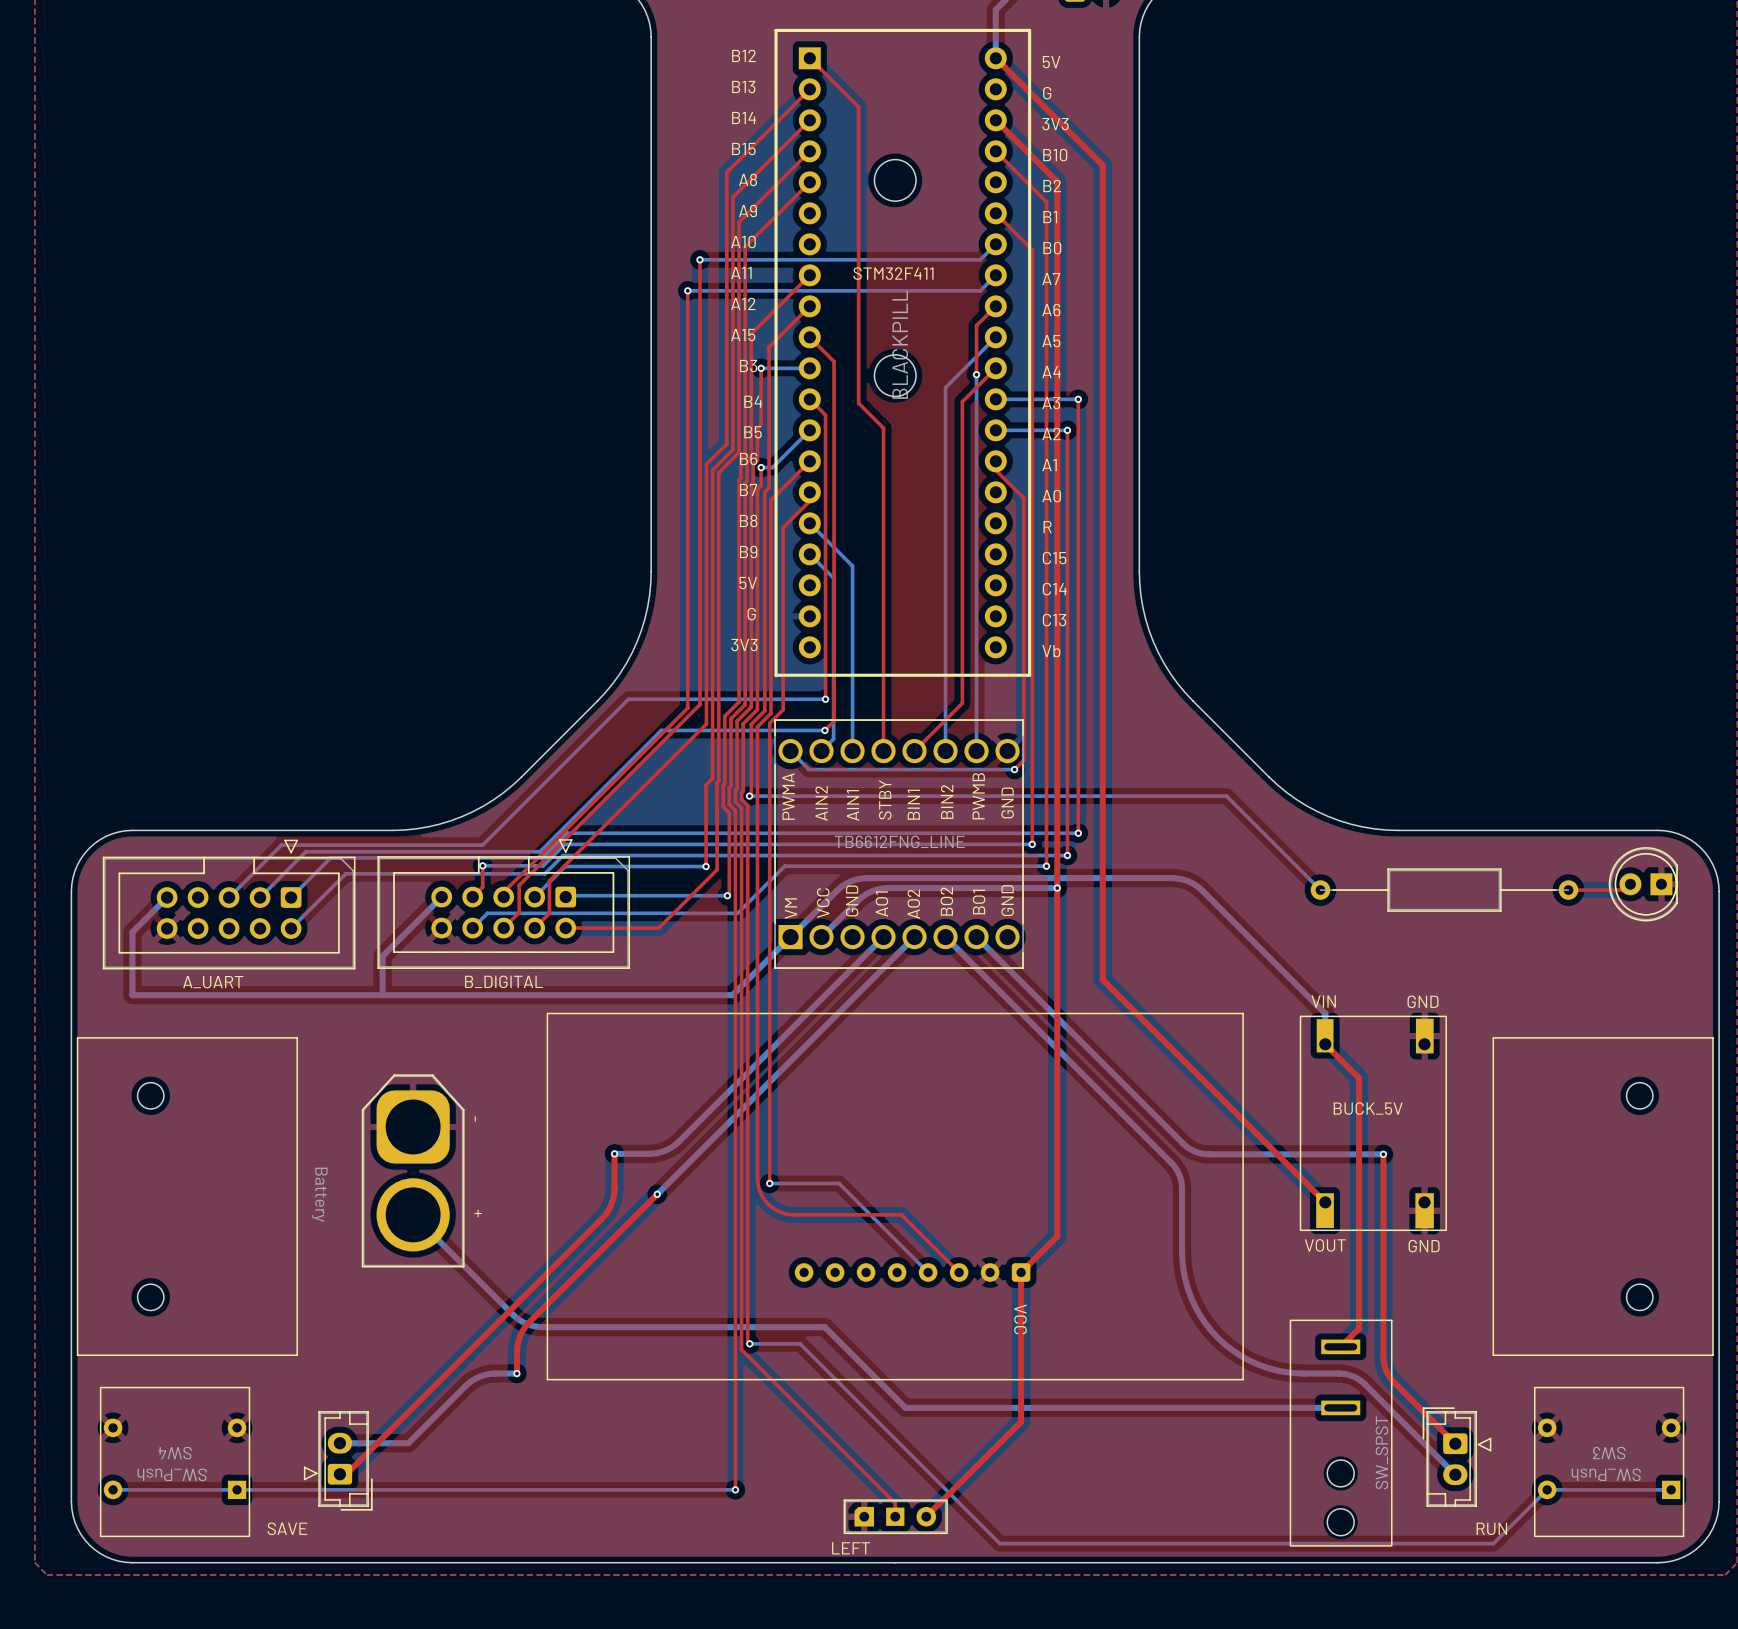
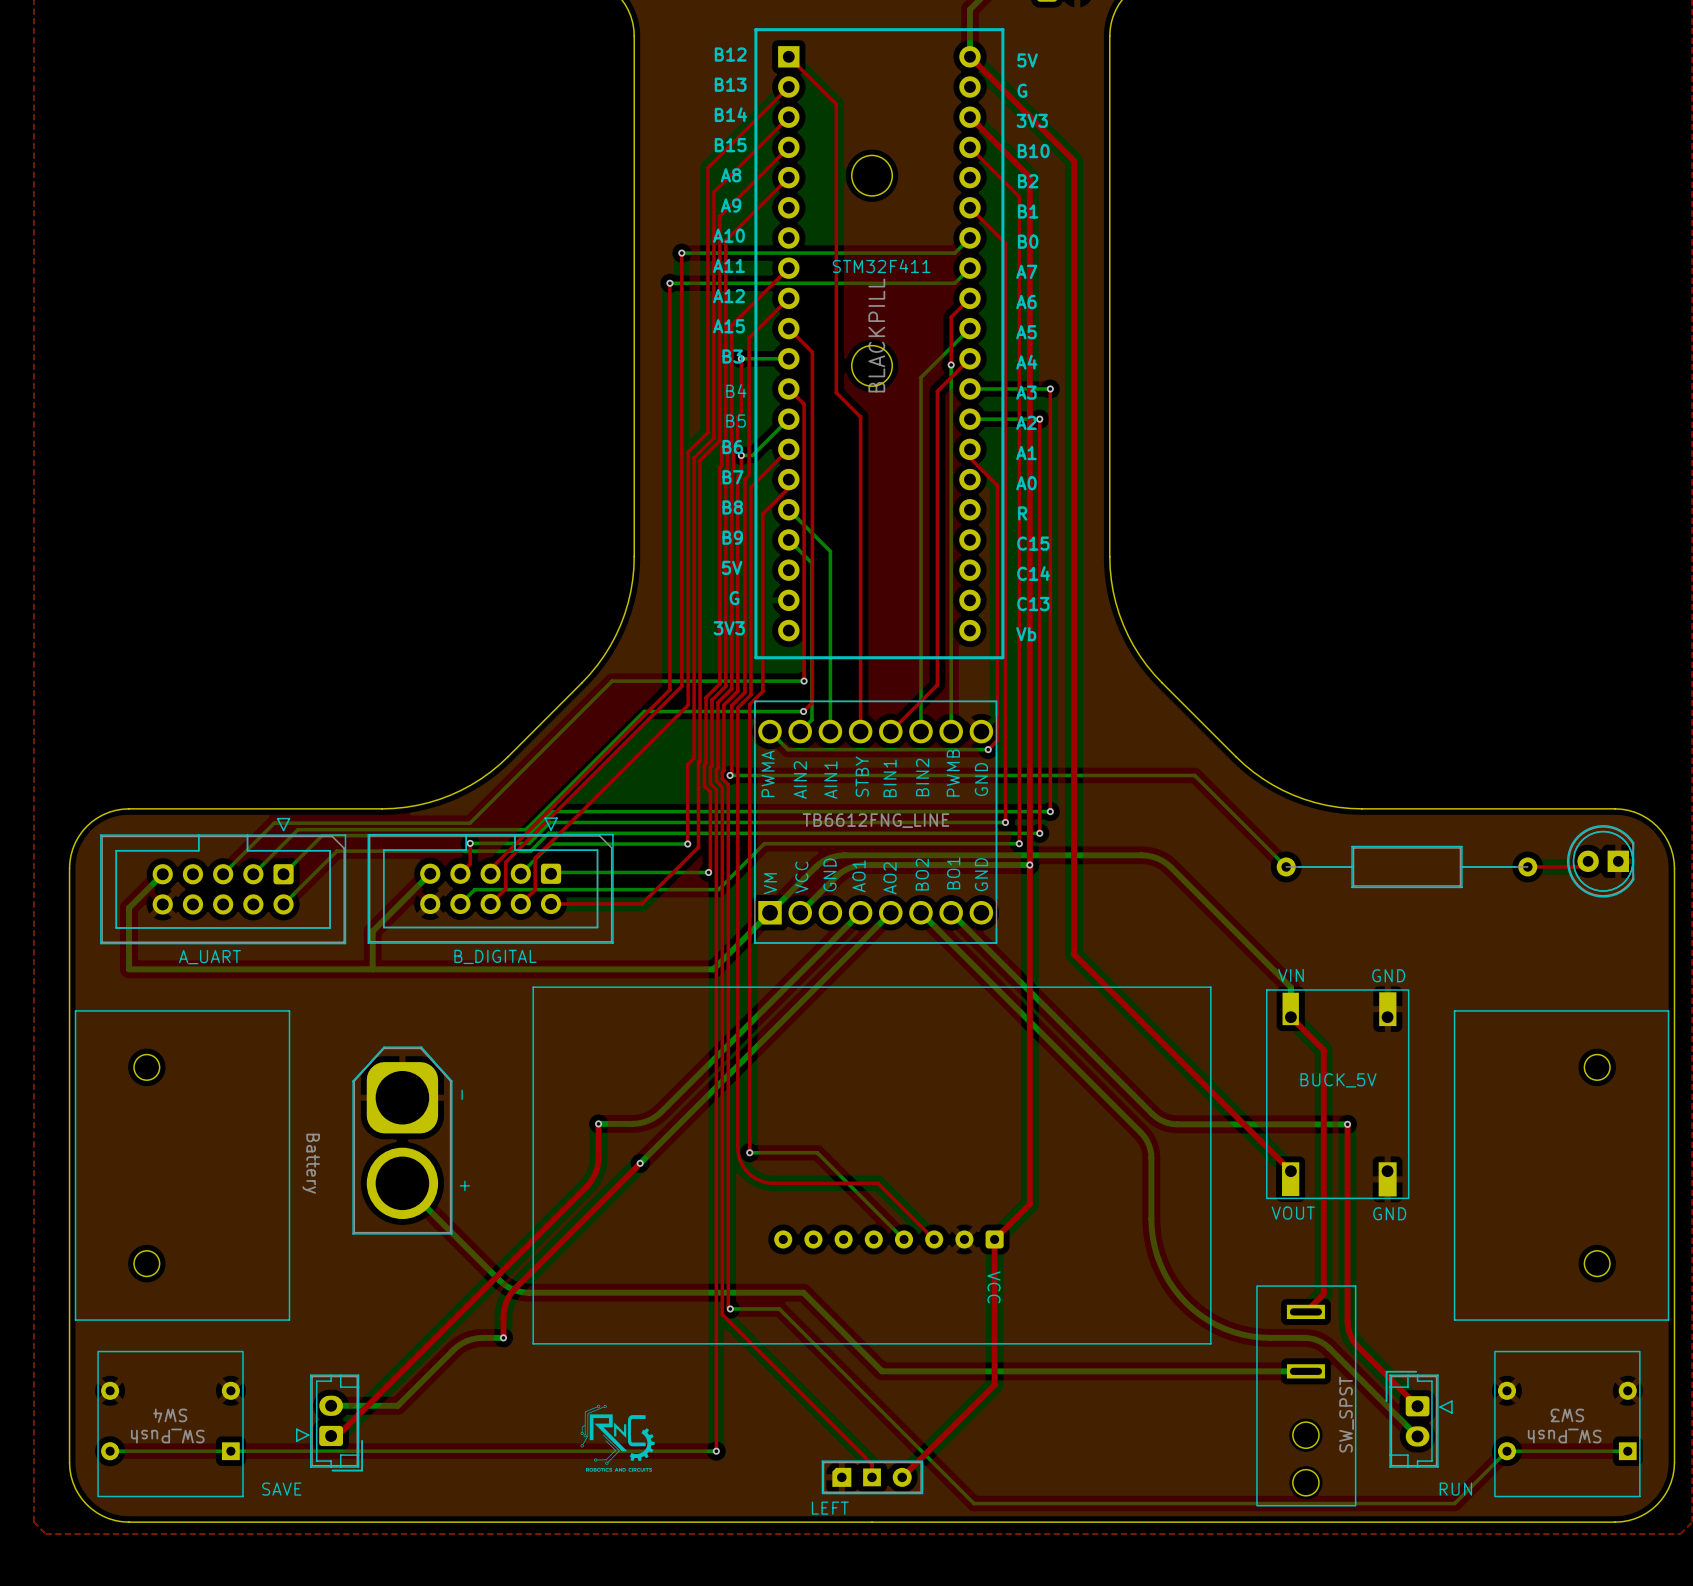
drawing: none -> [580, 1404, 655, 1472]

